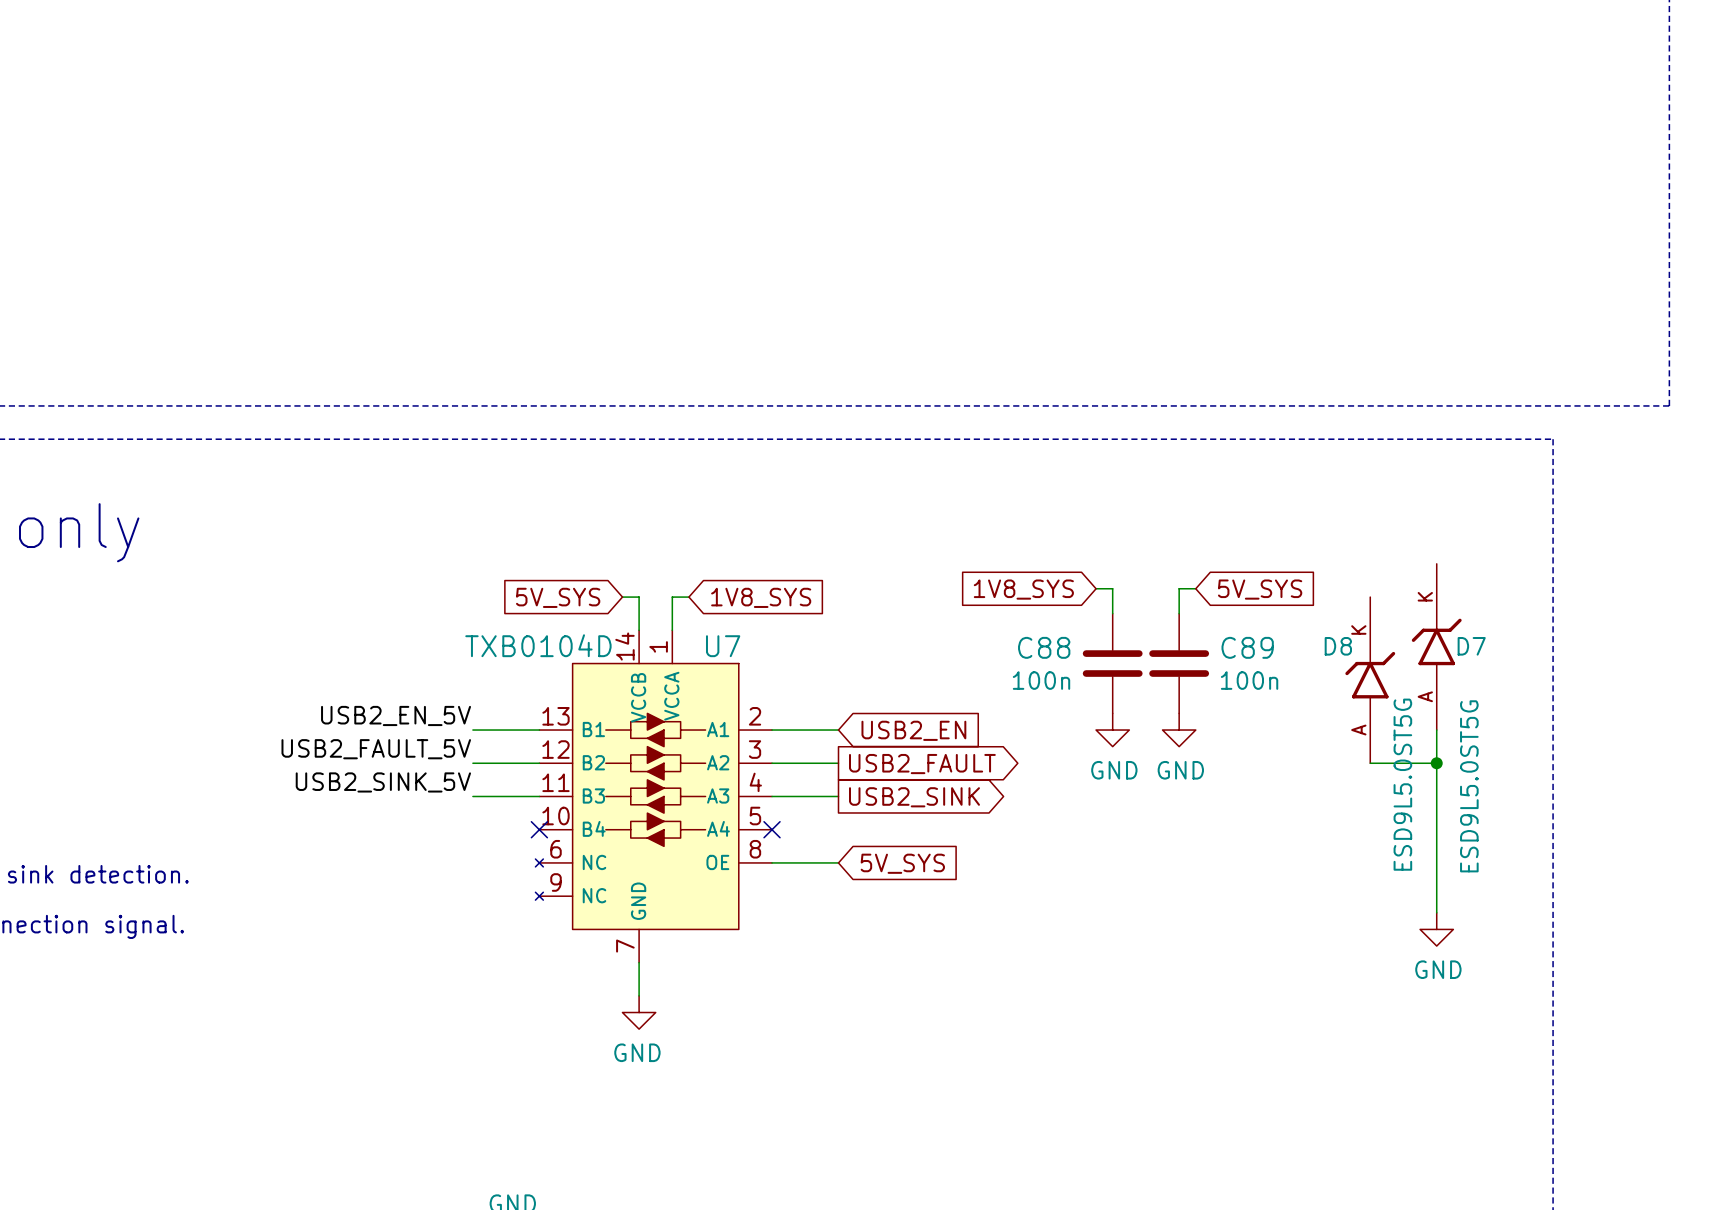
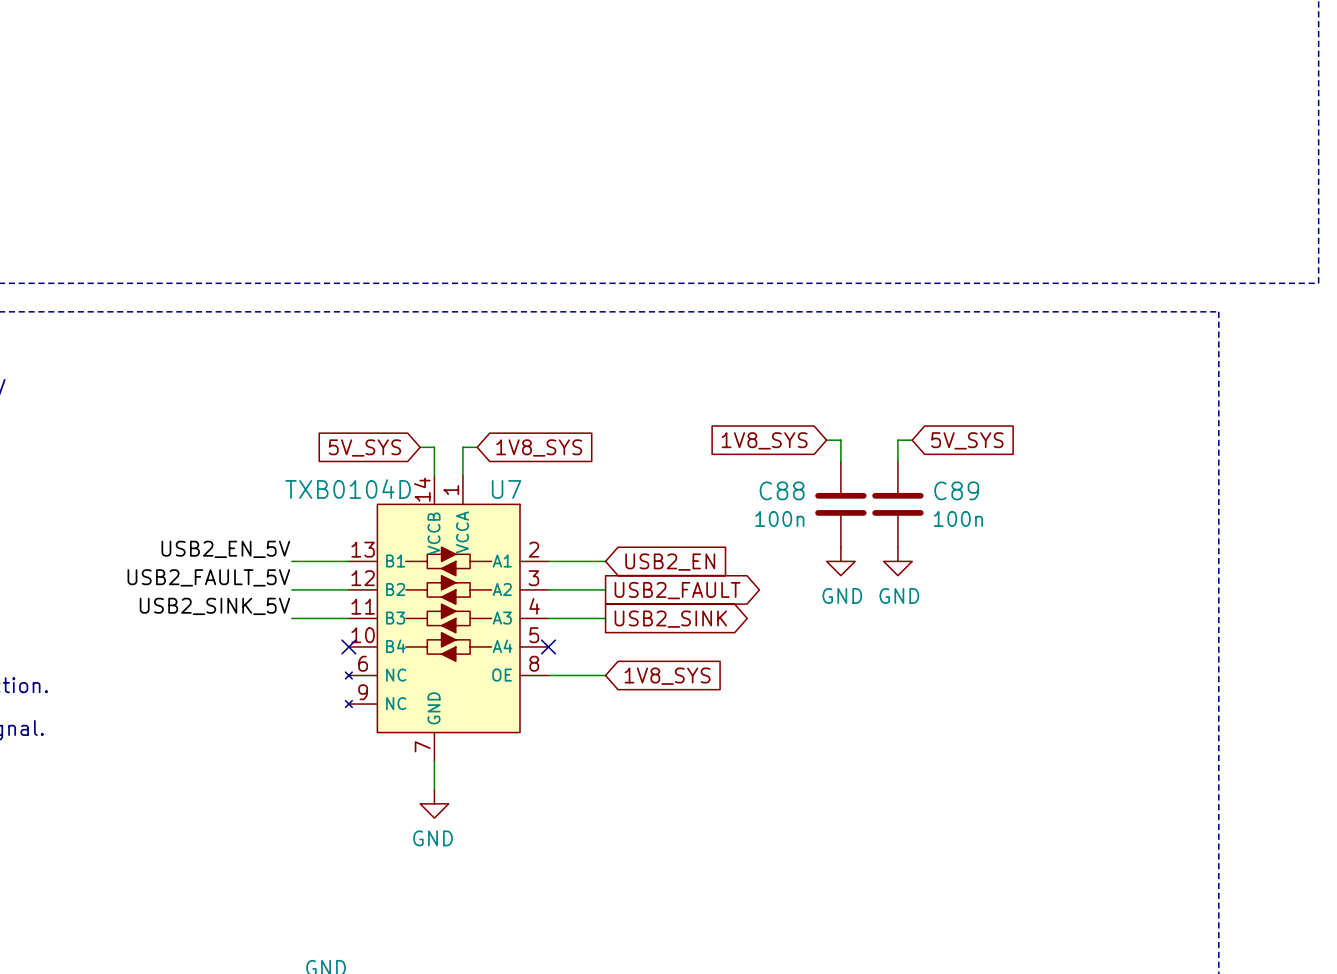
D7: ESD9L5.0ST5G (1436, 646) -> none
D8: ESD9L5.0ST5G (1370, 680) -> none
wire: (1436, 730) (1436, 912) -> none
wire: (1370, 763) (1436, 763) -> none
junction: (1436, 763) -> none
global label: 5V_SYS (902, 863) -> 1V8_SYS (667, 676)
power symbol: GND (1436, 929) -> none

